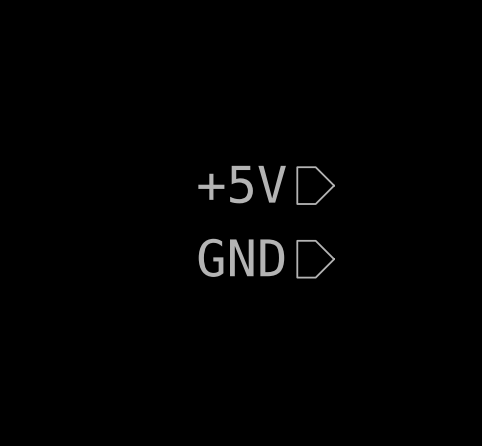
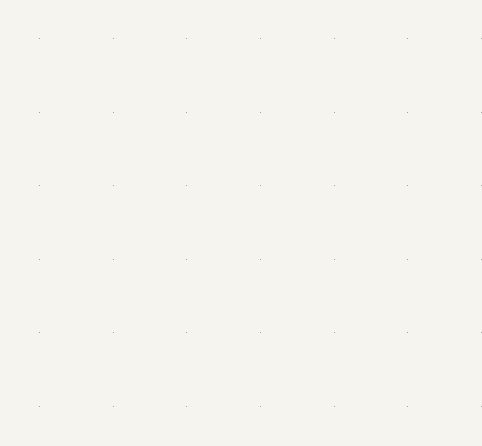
hierarchical label: +5V (242, 184) -> none
hierarchical label: GND (241, 257) -> none

